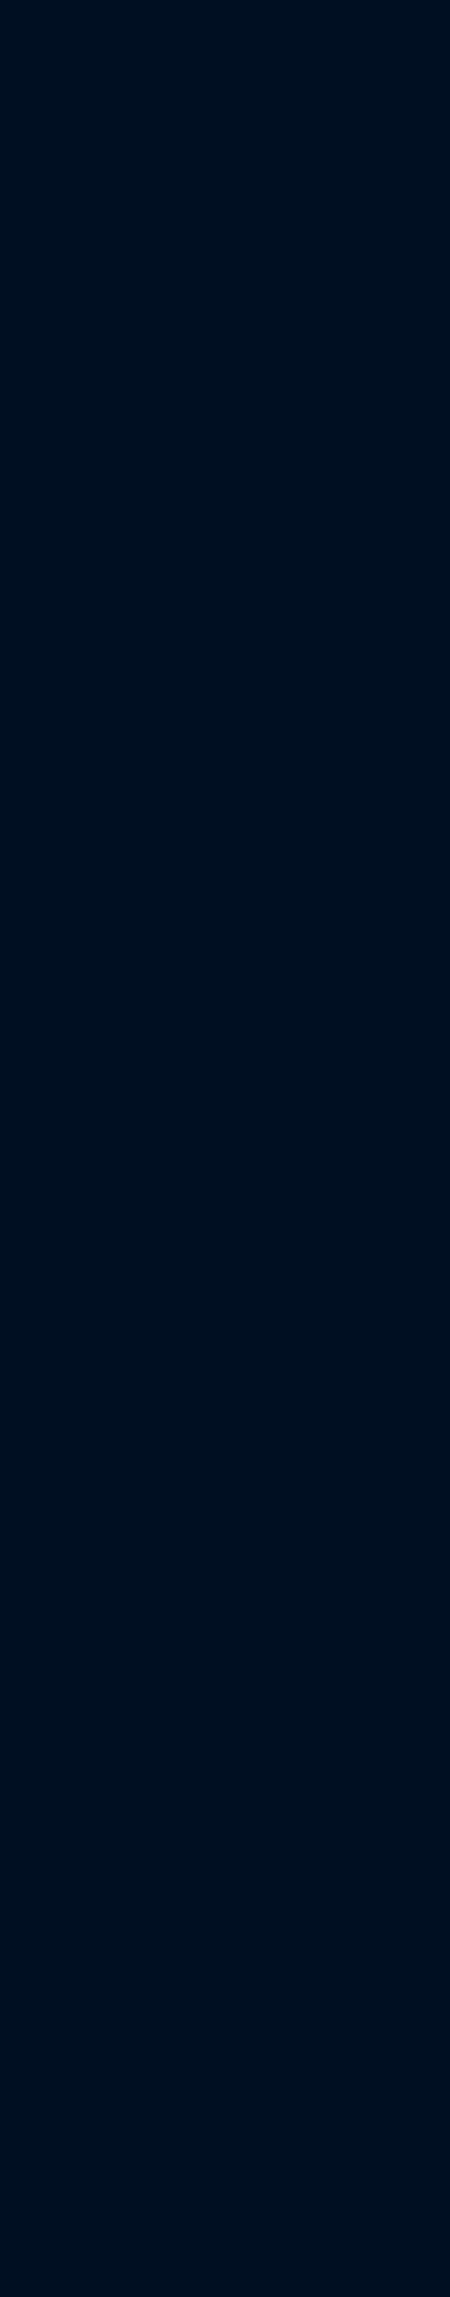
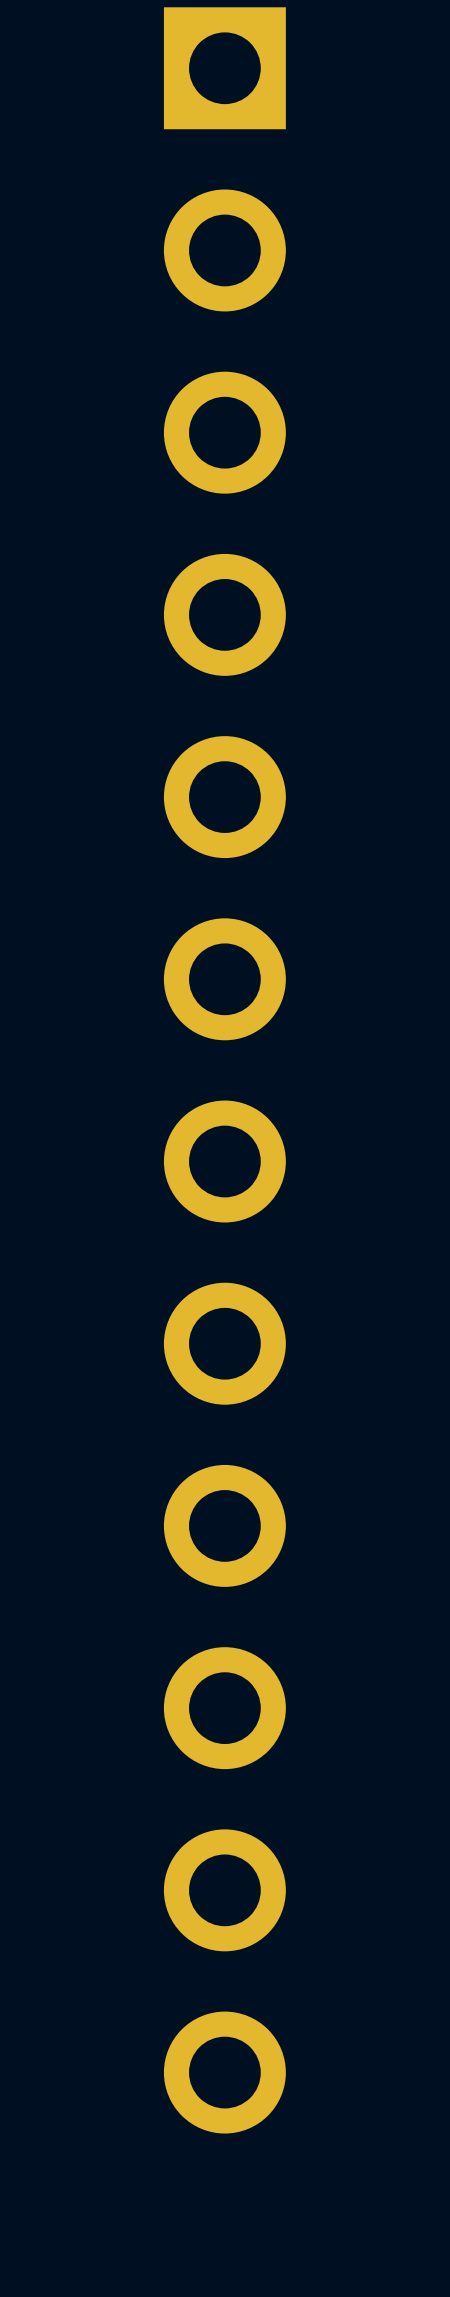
part: none -> (224, 1070)

